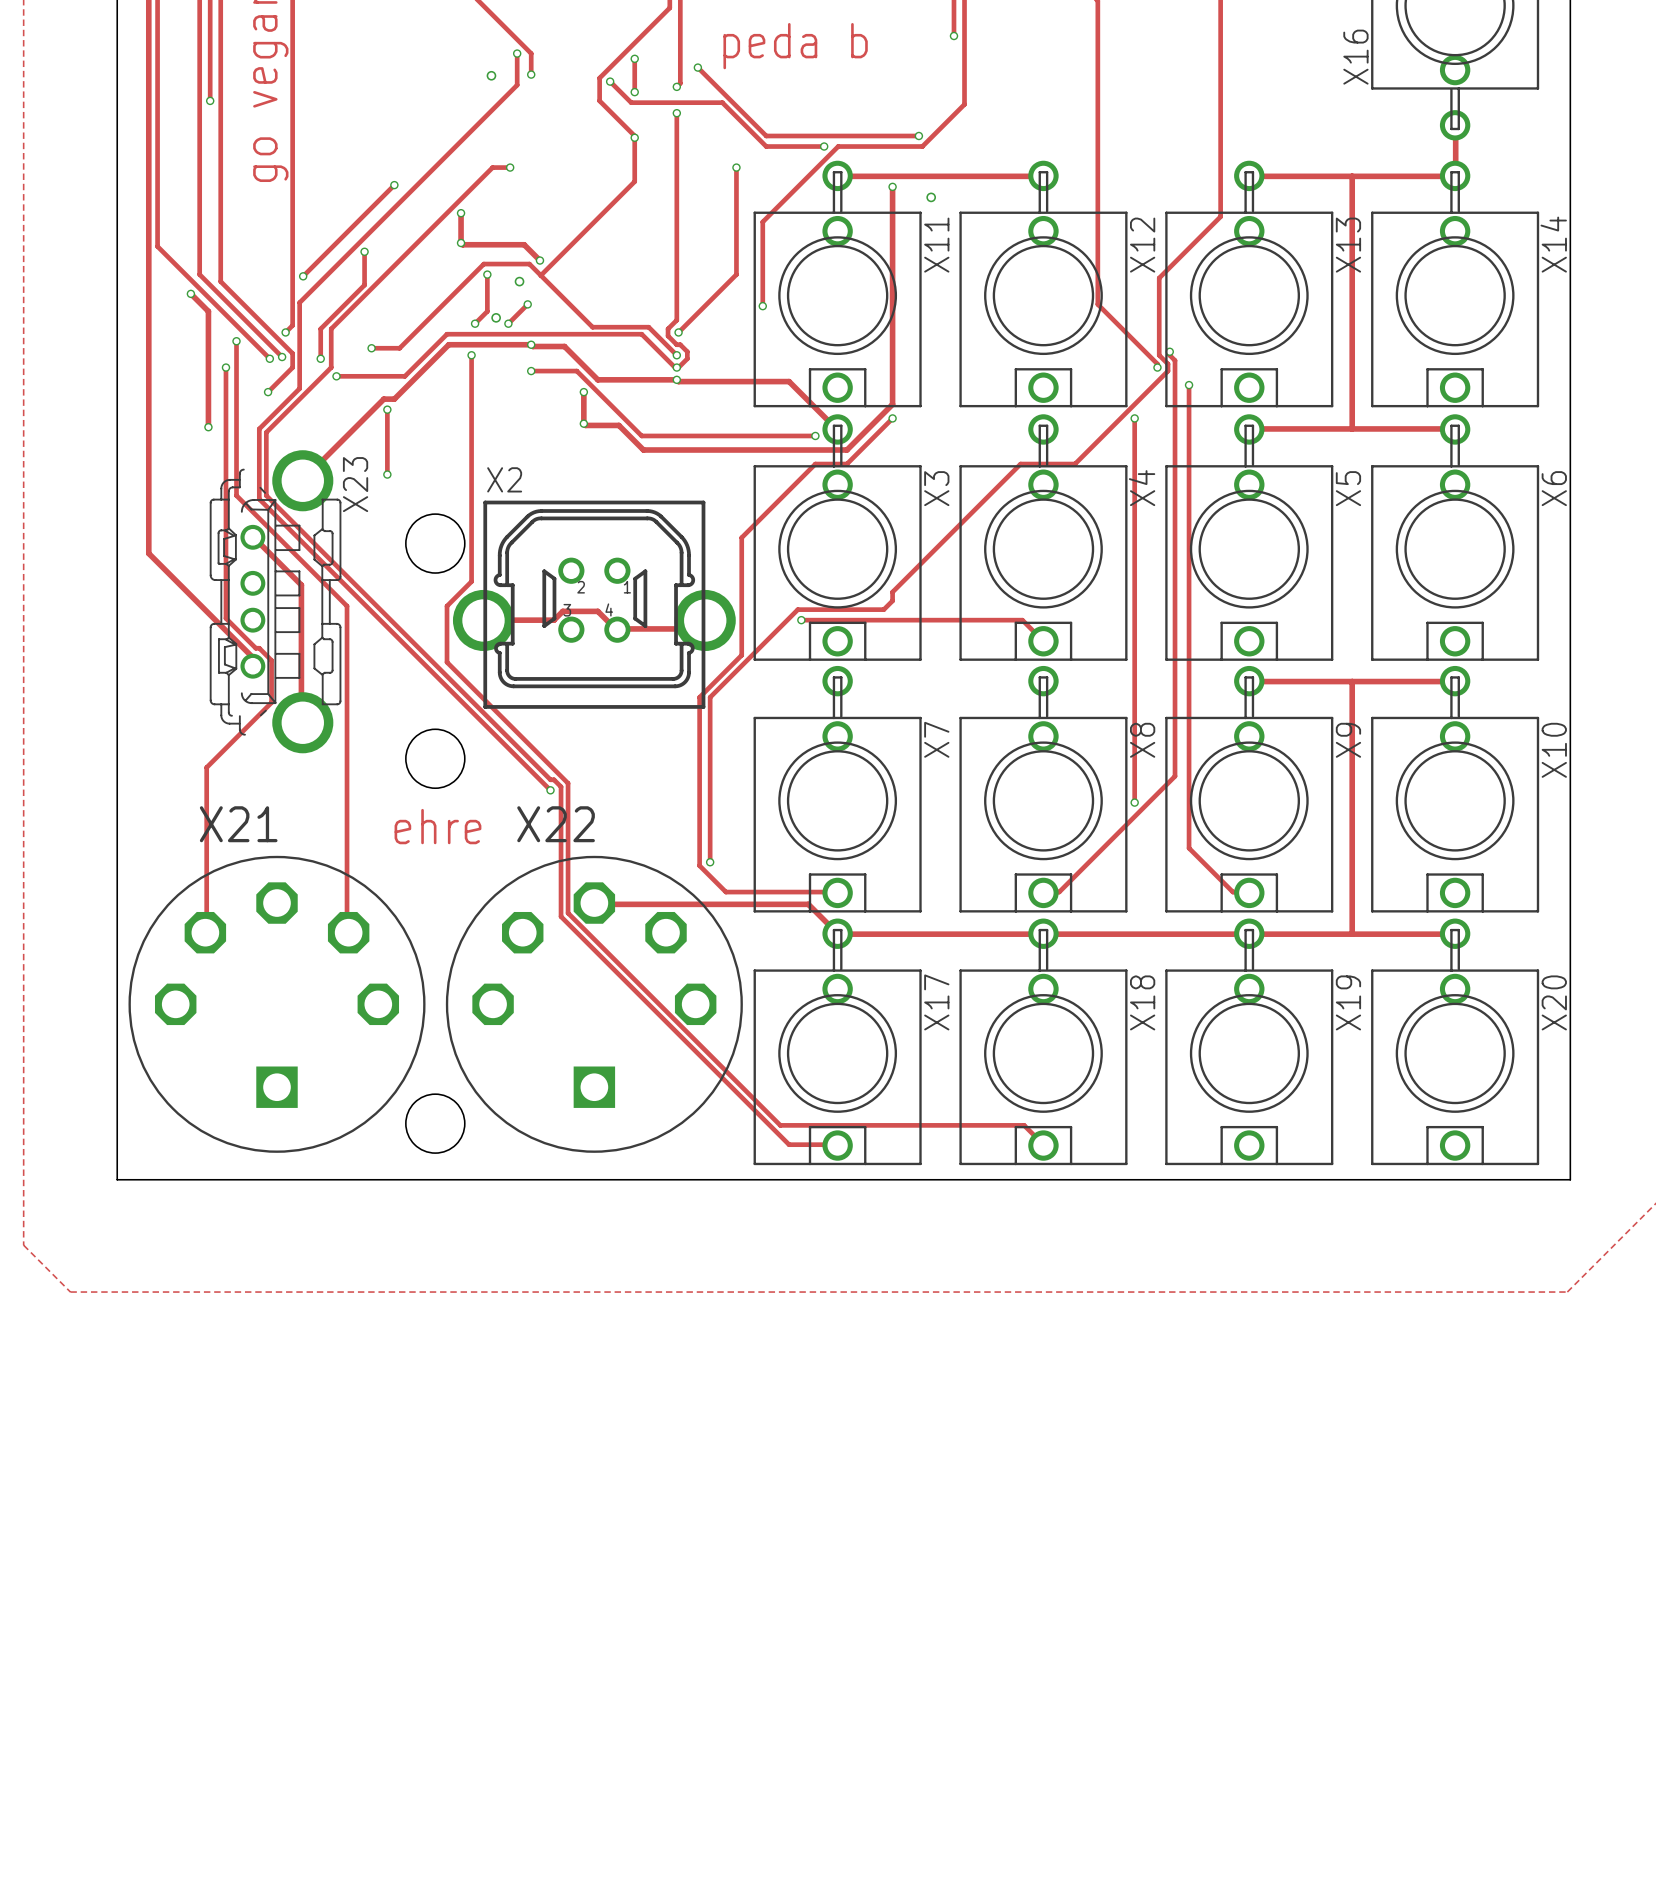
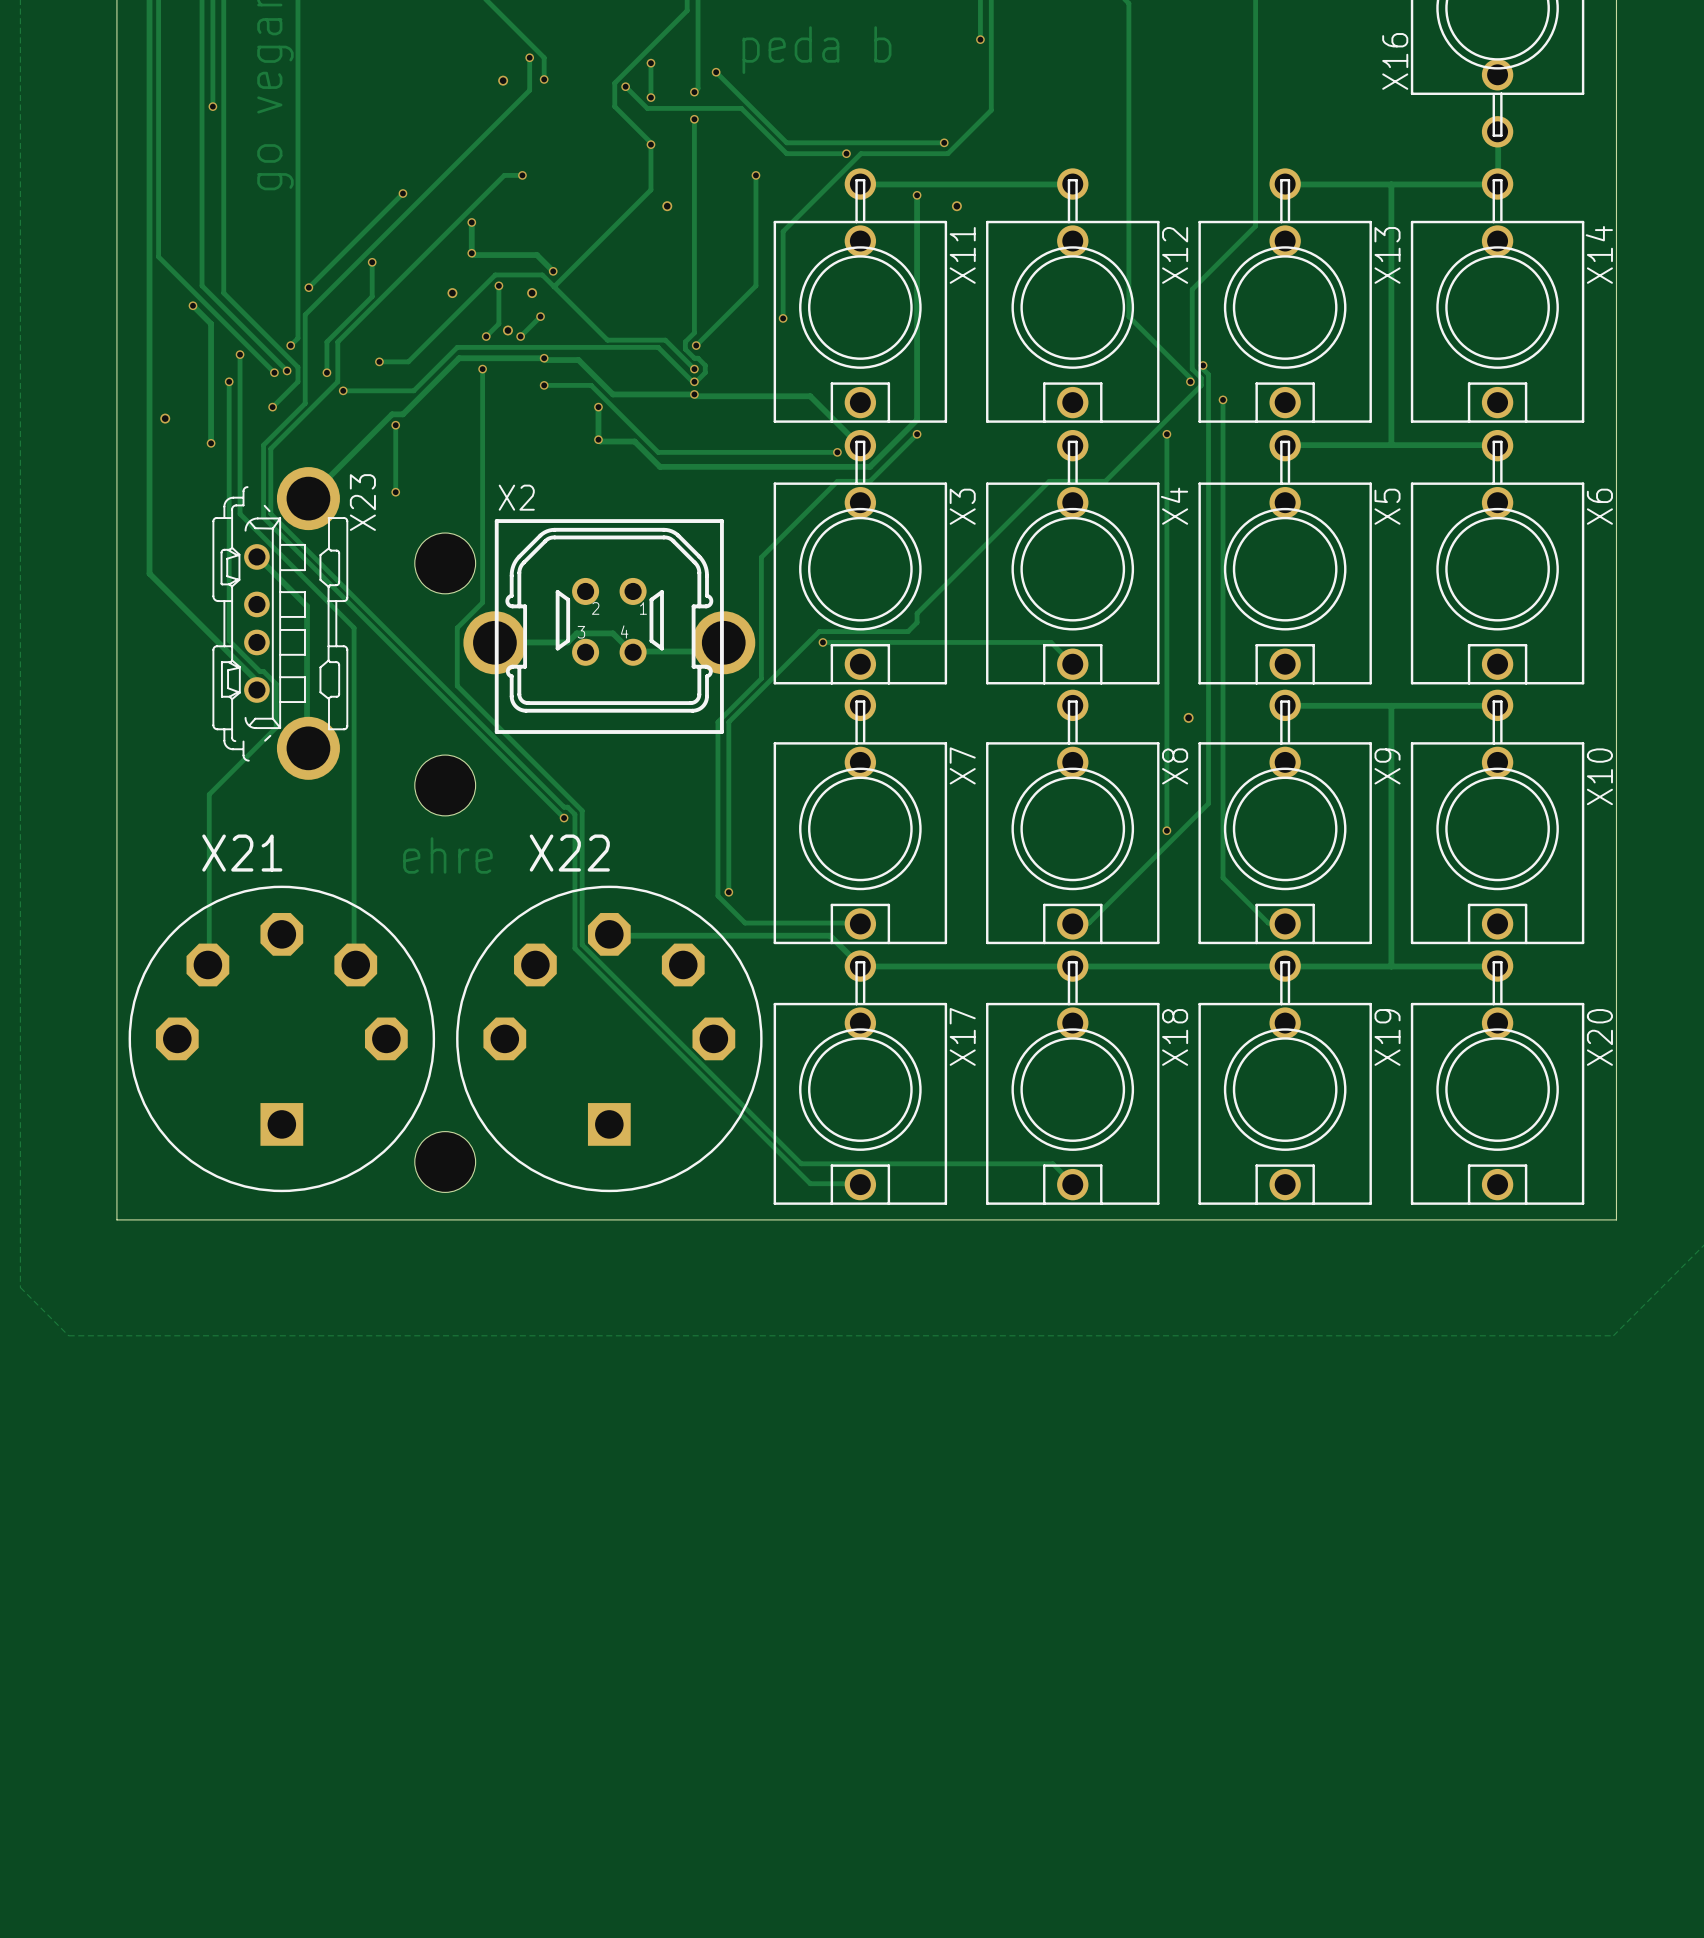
via: none -> (667, 206)
via: none -> (452, 293)
via: none -> (165, 418)
via: none -> (1188, 717)

